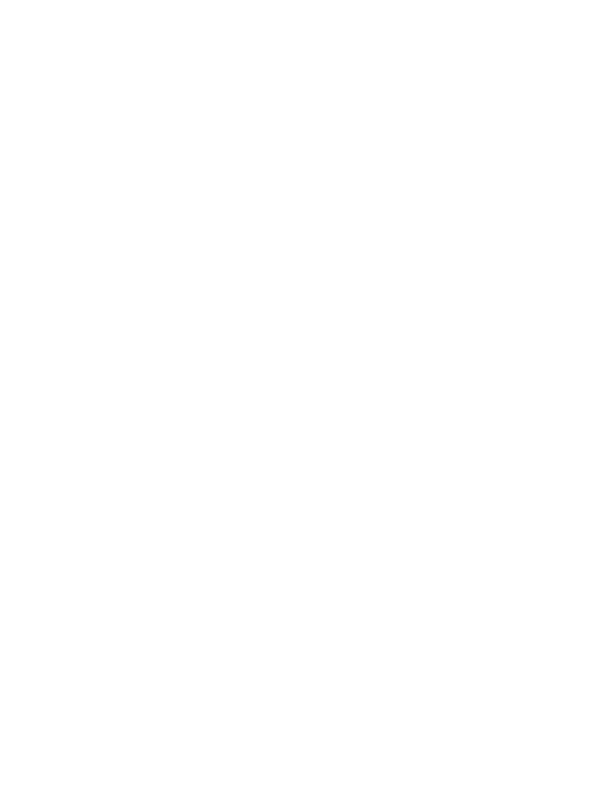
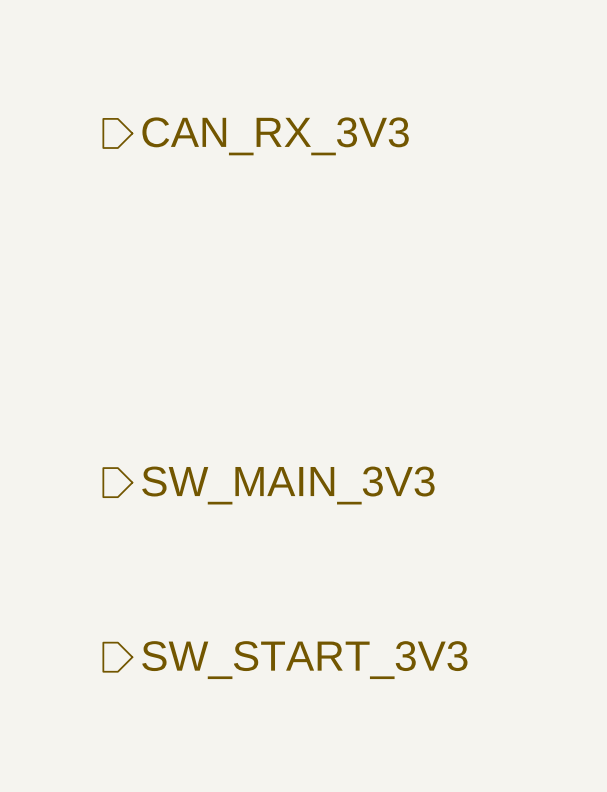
hierarchical label: none -> CAN_RX_3V3 (275, 136)
hierarchical label: none -> SW_MAIN_3V3 (288, 485)
hierarchical label: none -> SW_START_3V3 (304, 660)

